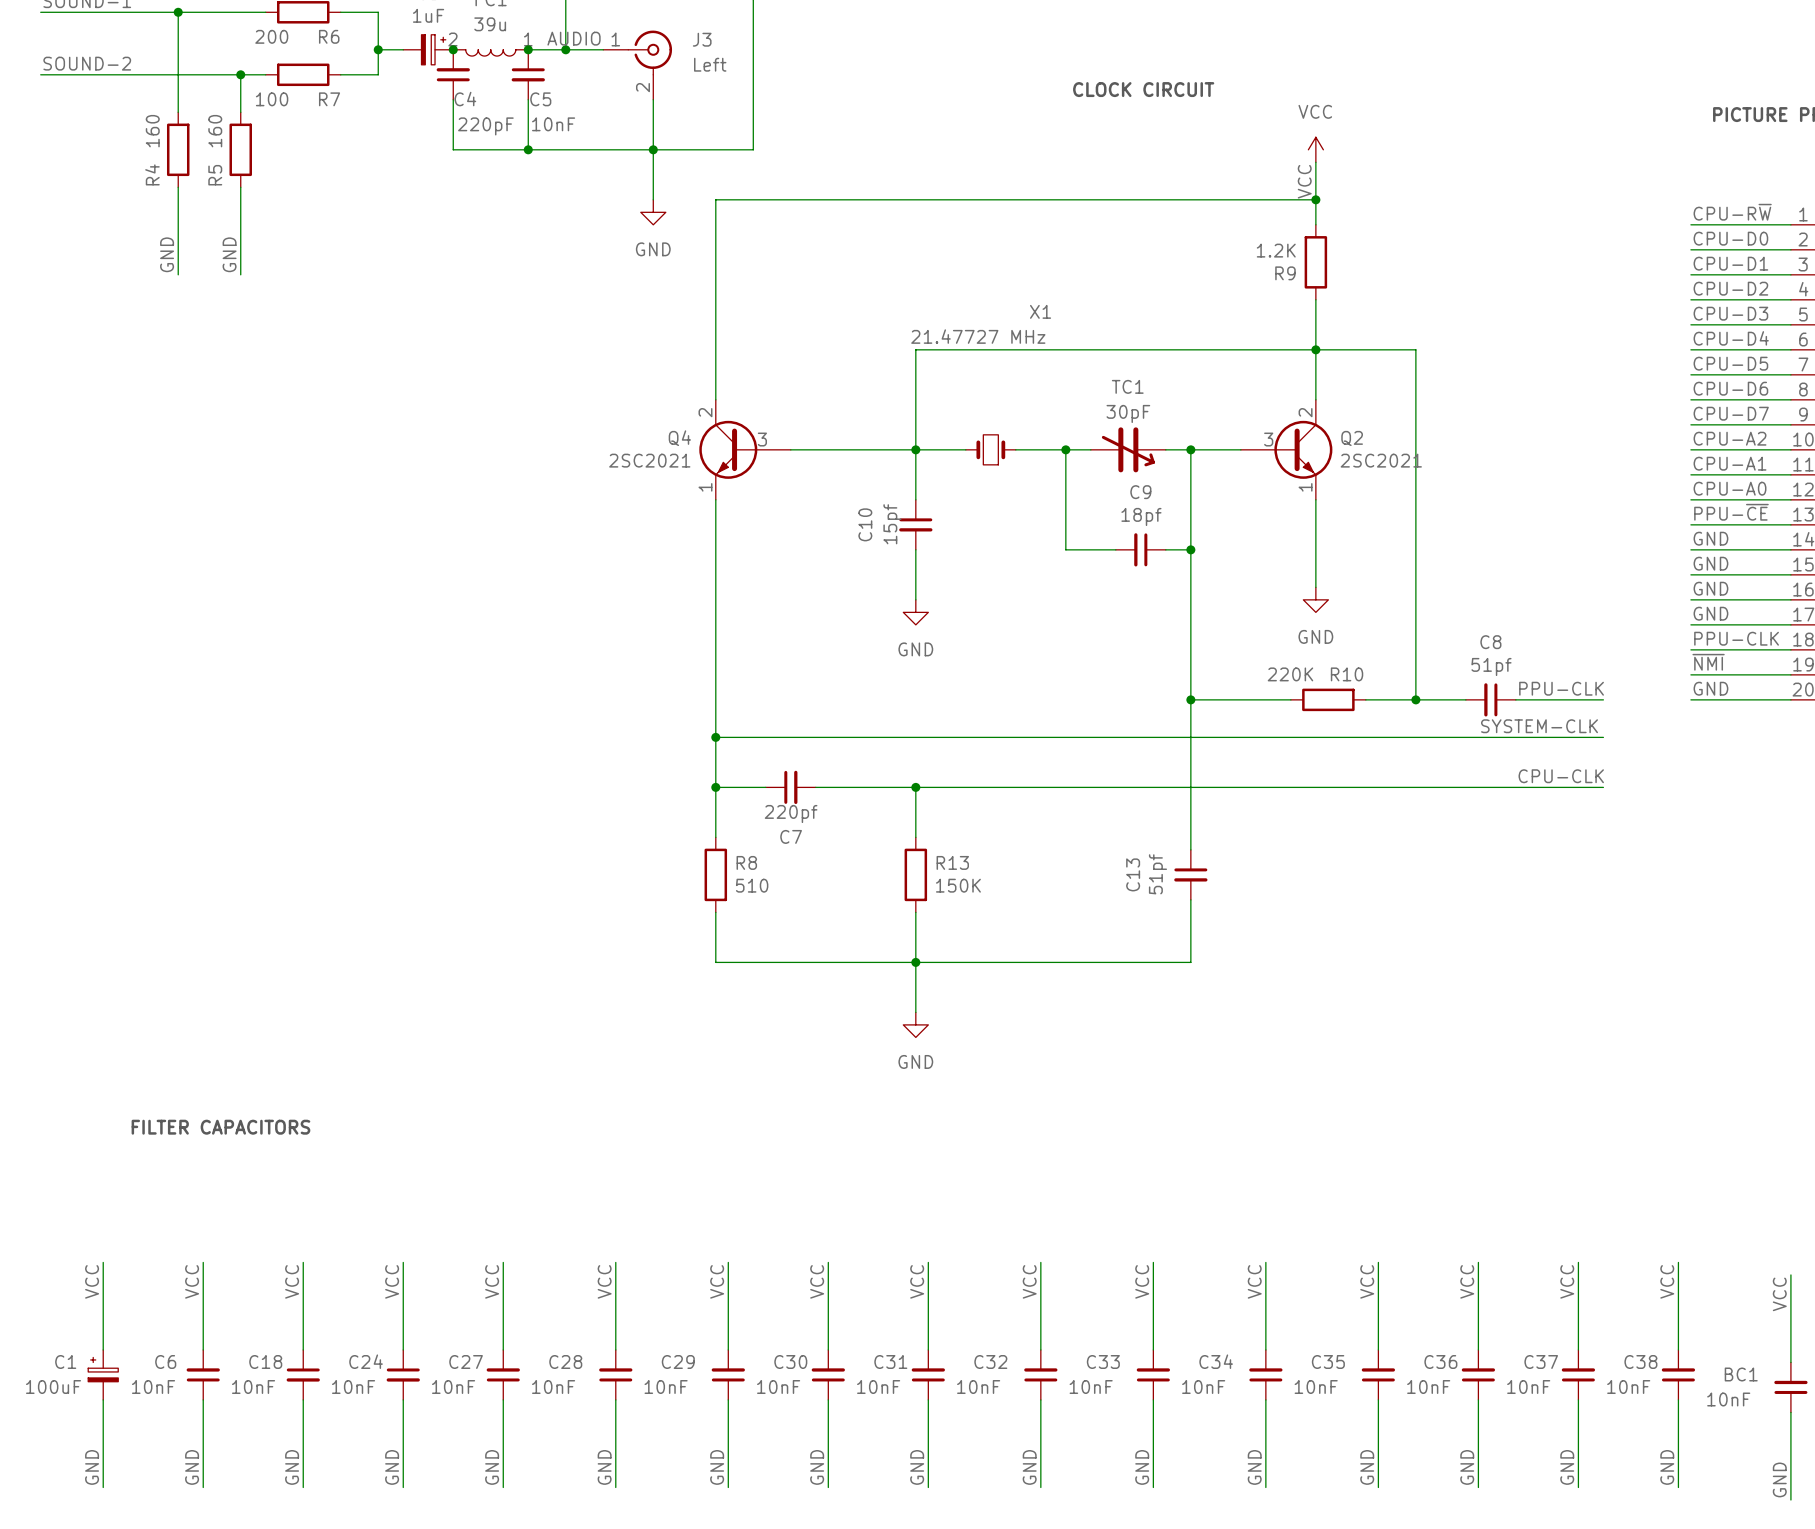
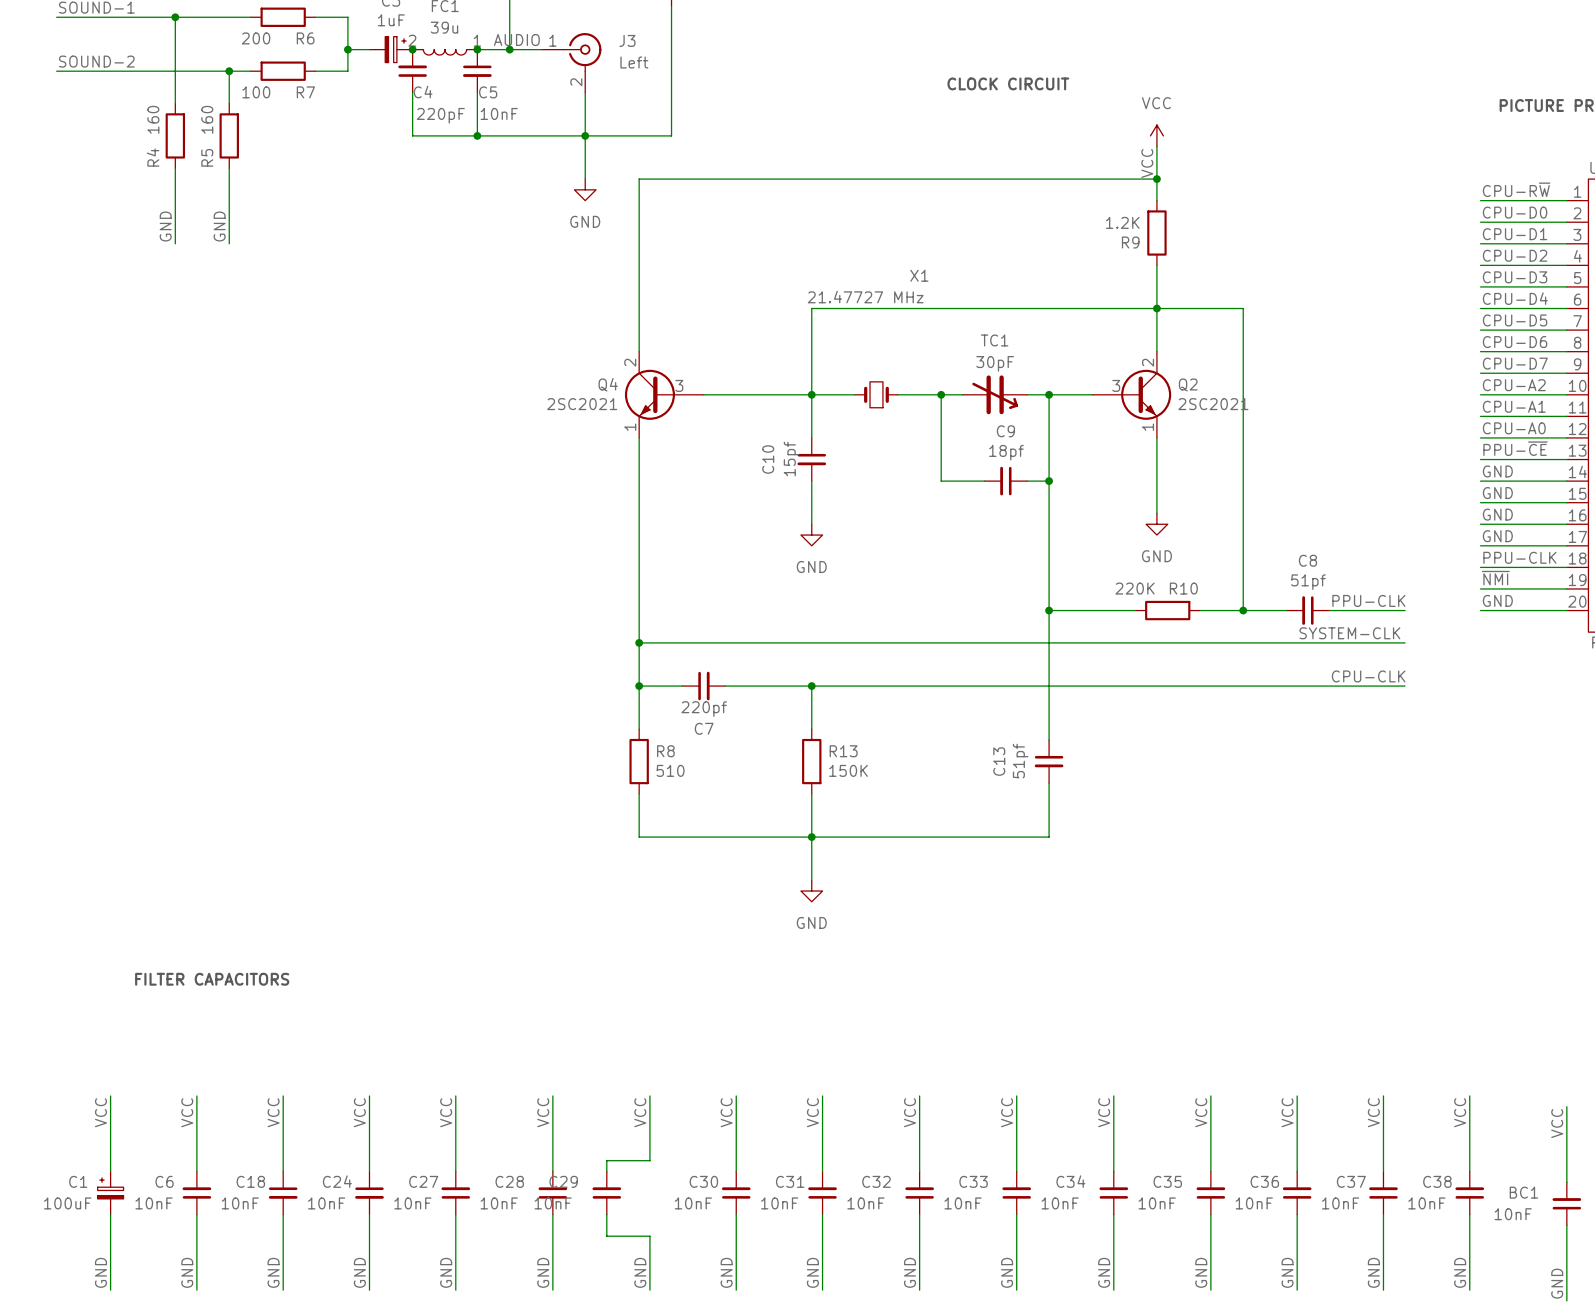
wire: (728, 1337) (728, 1349) -> (649, 1160) (606, 1160) (606, 1171)
C29 position: (728, 1374) -> (606, 1193)
wire: (728, 1399) (728, 1424) -> (606, 1214) (606, 1236) (649, 1236)

